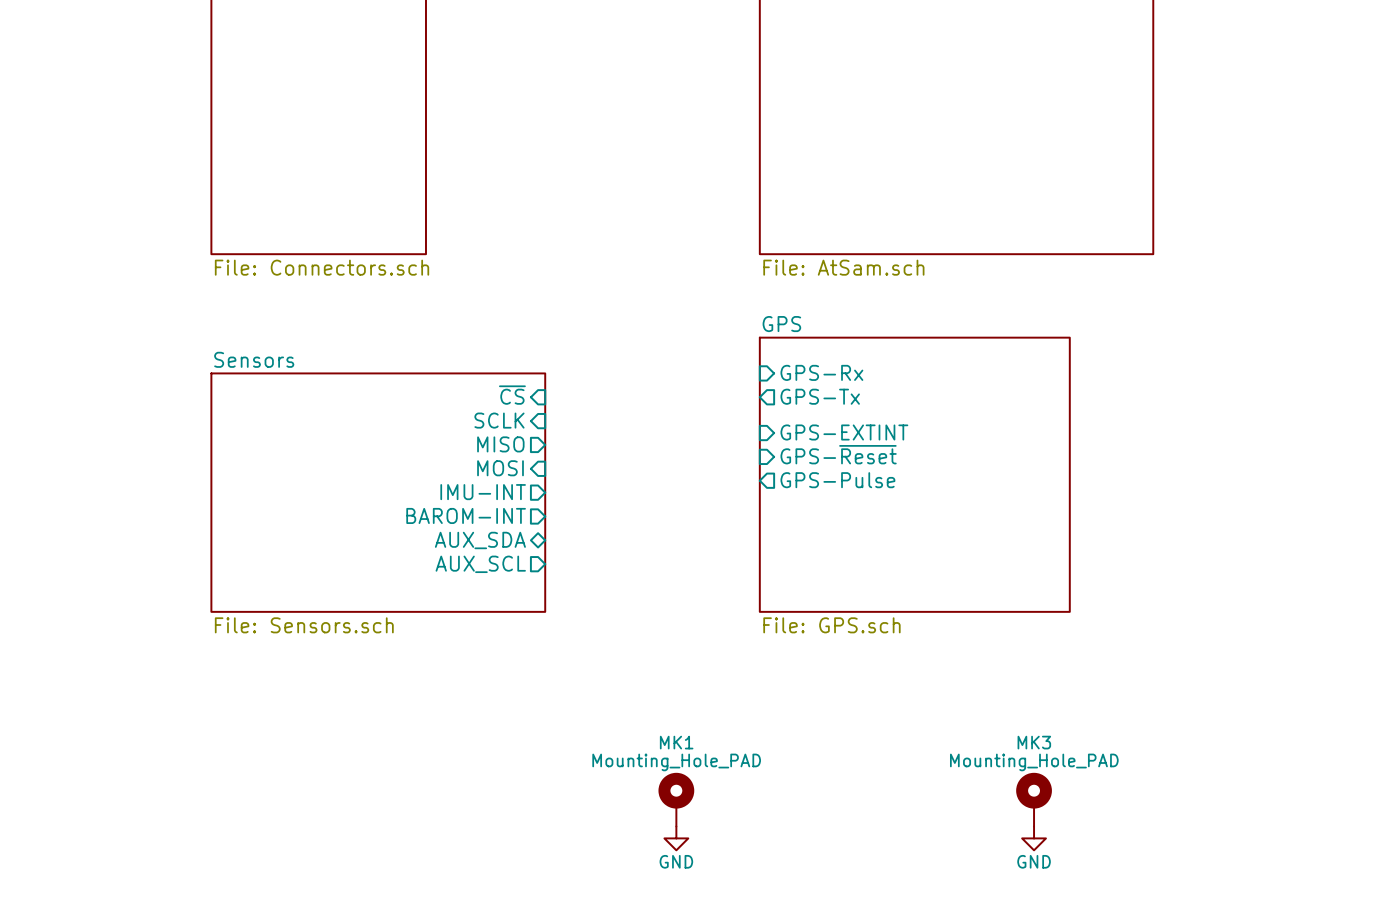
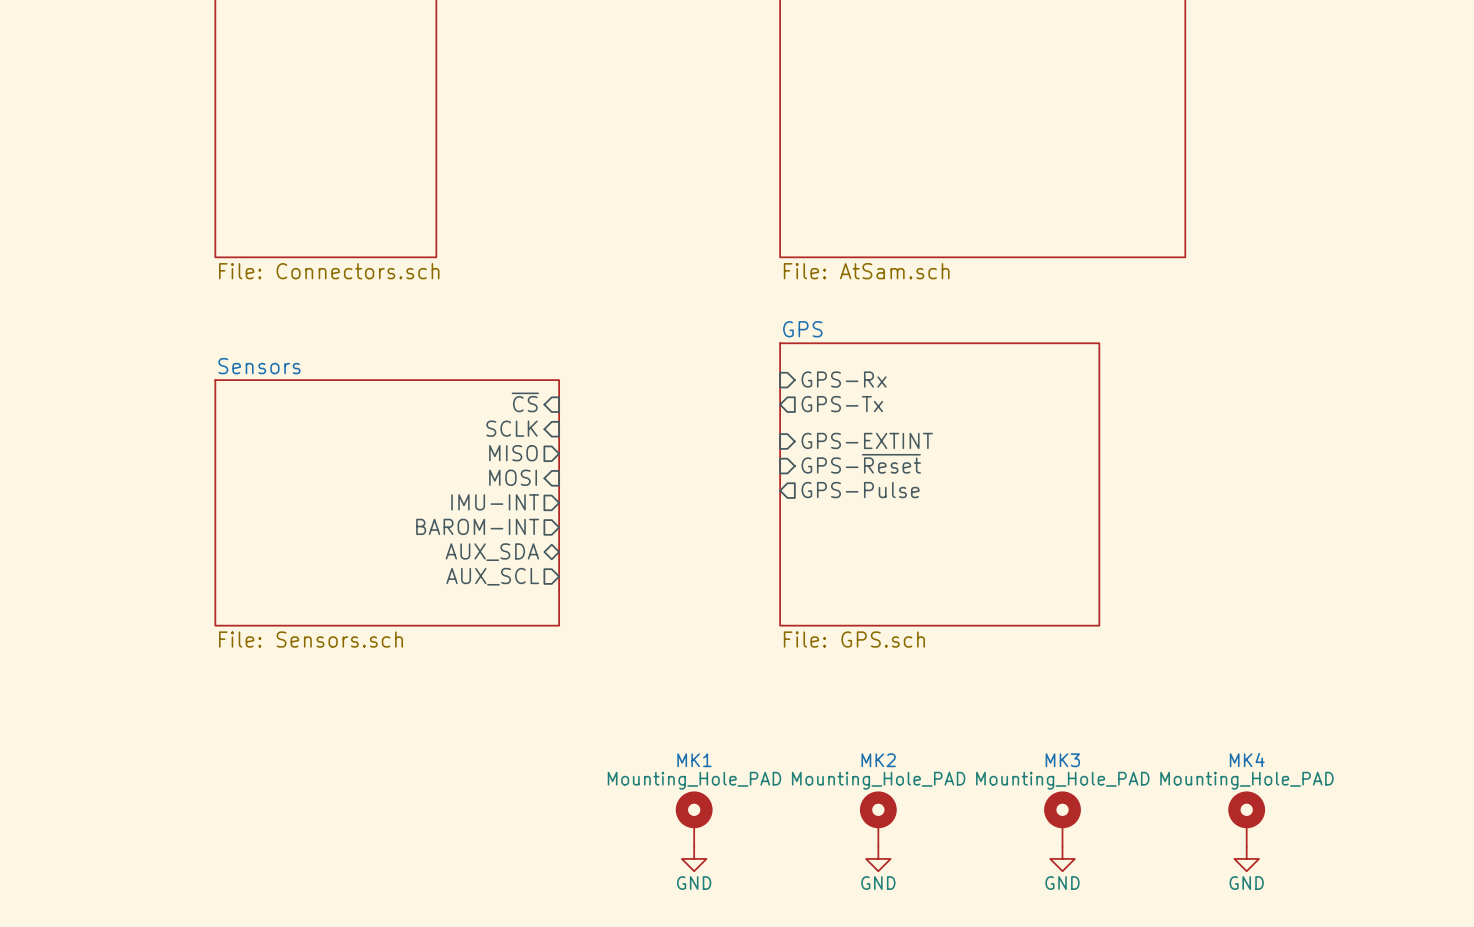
MK2: none -> Mounting_Hole_PAD (878, 819)
MK4: none -> Mounting_Hole_PAD (1246, 819)
power symbol: none -> GND (878, 858)
power symbol: none -> GND (1246, 858)

